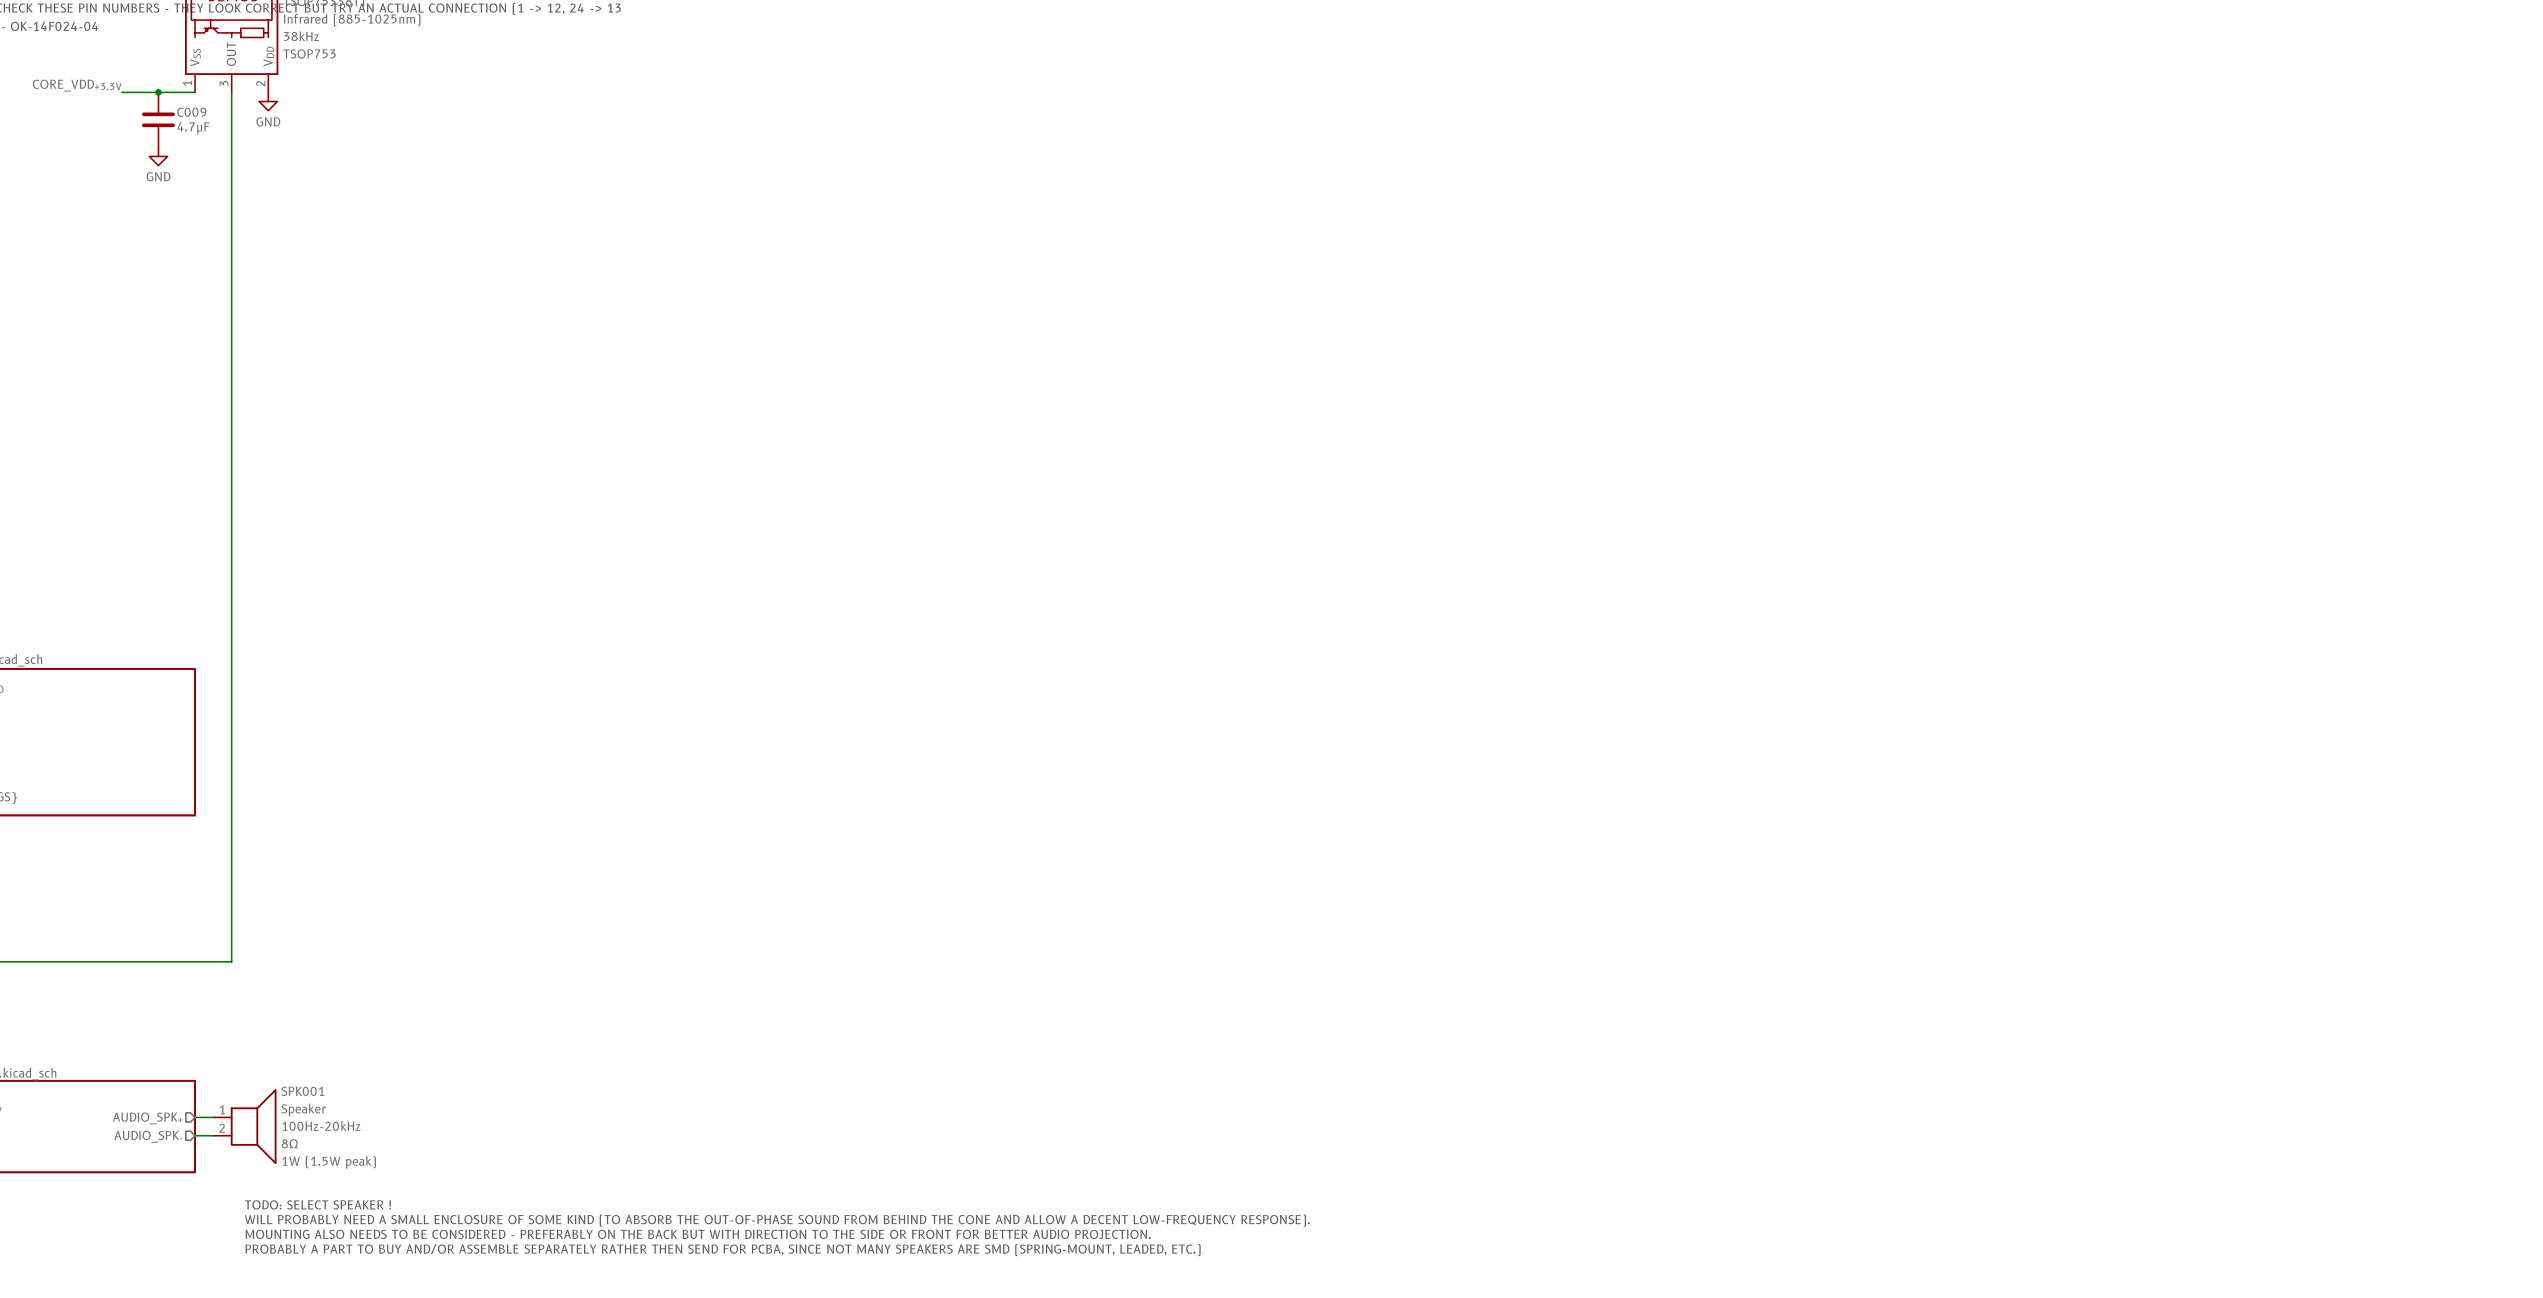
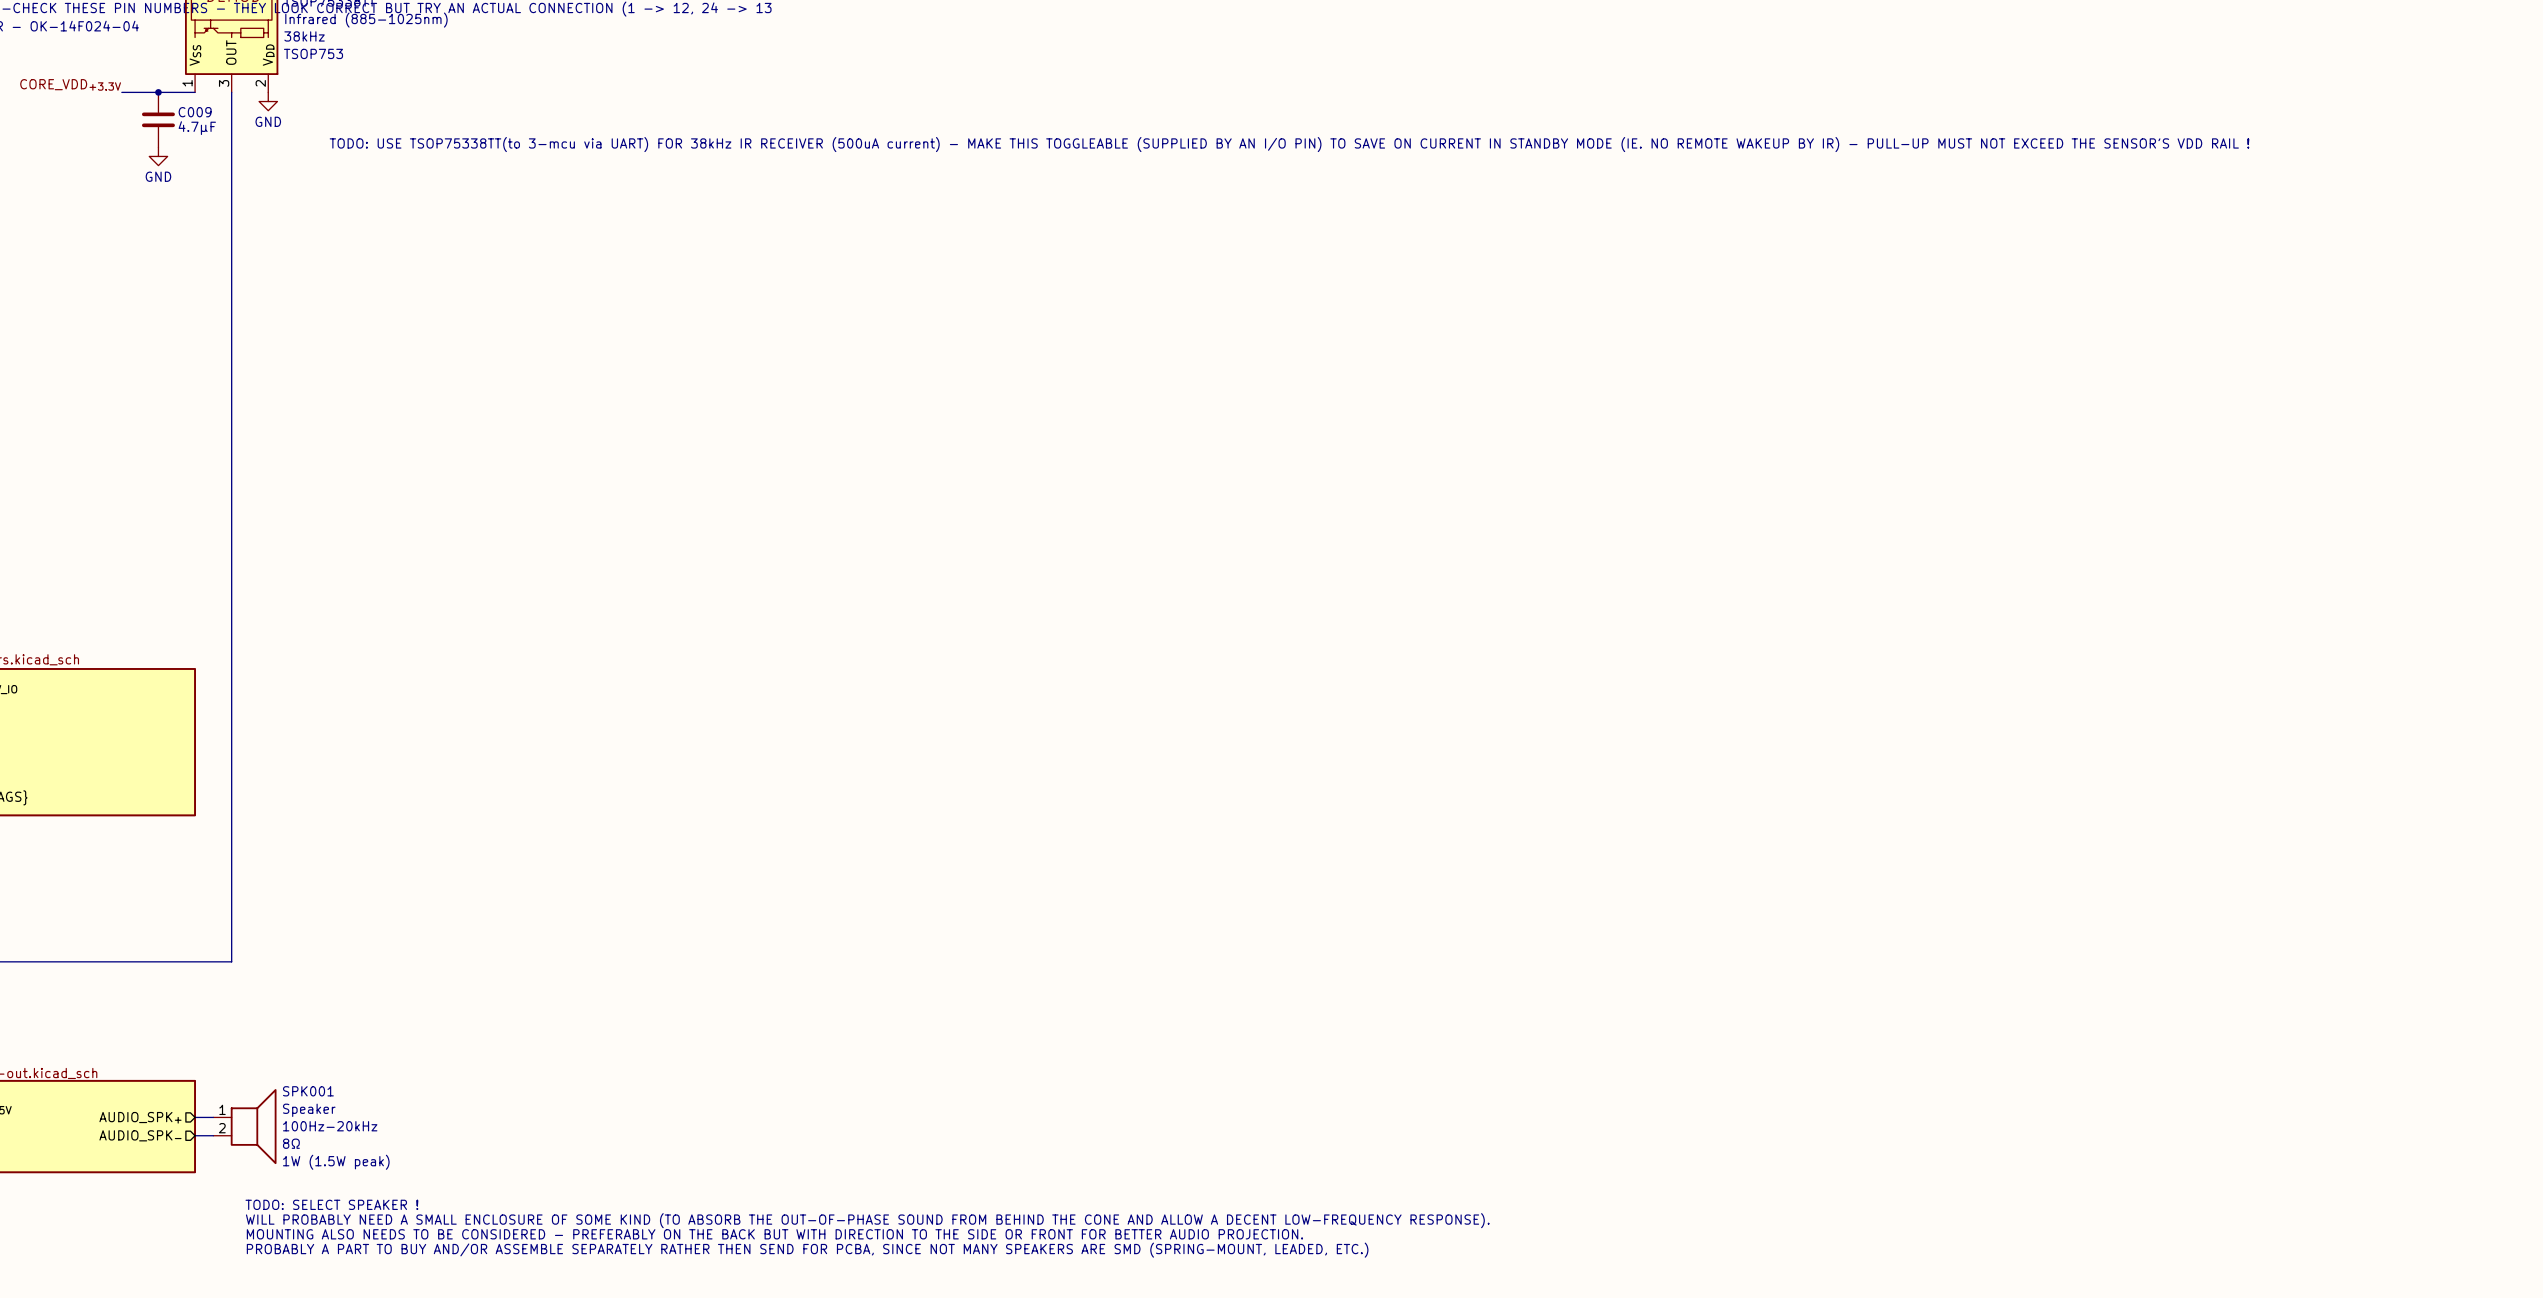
text: none -> TODO: USE TSOP75338TT(to 3-mcu via UART) FOR 38kHz IR RECEIVER (500uA current) - MAKE THIS TOGGLEABLE (SUPPLIED BY AN I/O PIN) TO SAVE ON CURRENT IN STANDBY MODE (IE. NO REMOTE WAKEUP BY IR) - PULL-UP MUST NOT EXCEED THE SENSOR'S VDD RAIL ! (1289, 144)

